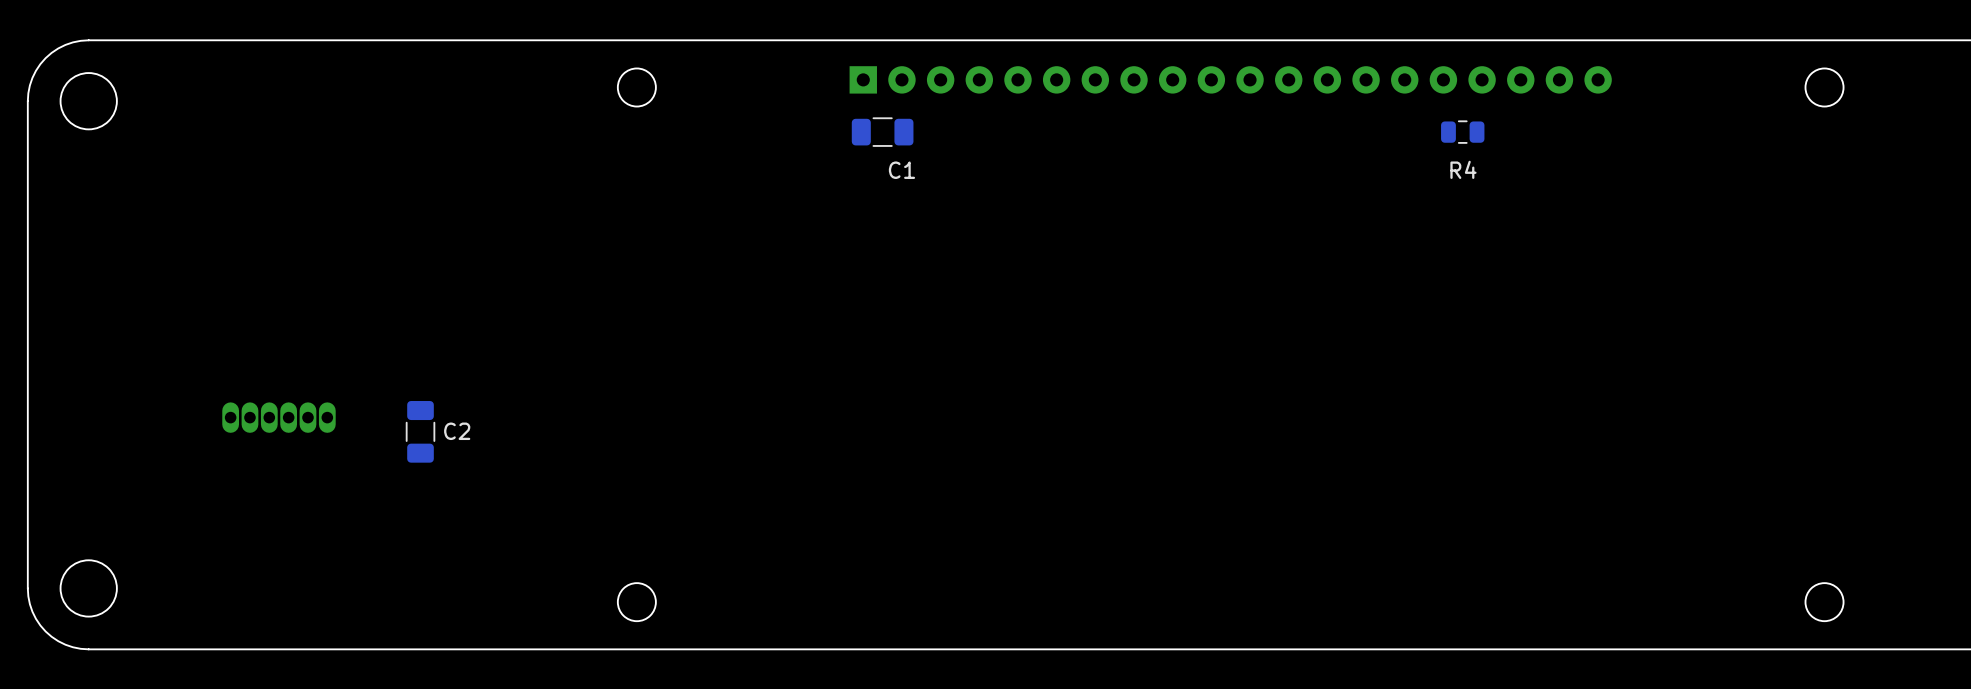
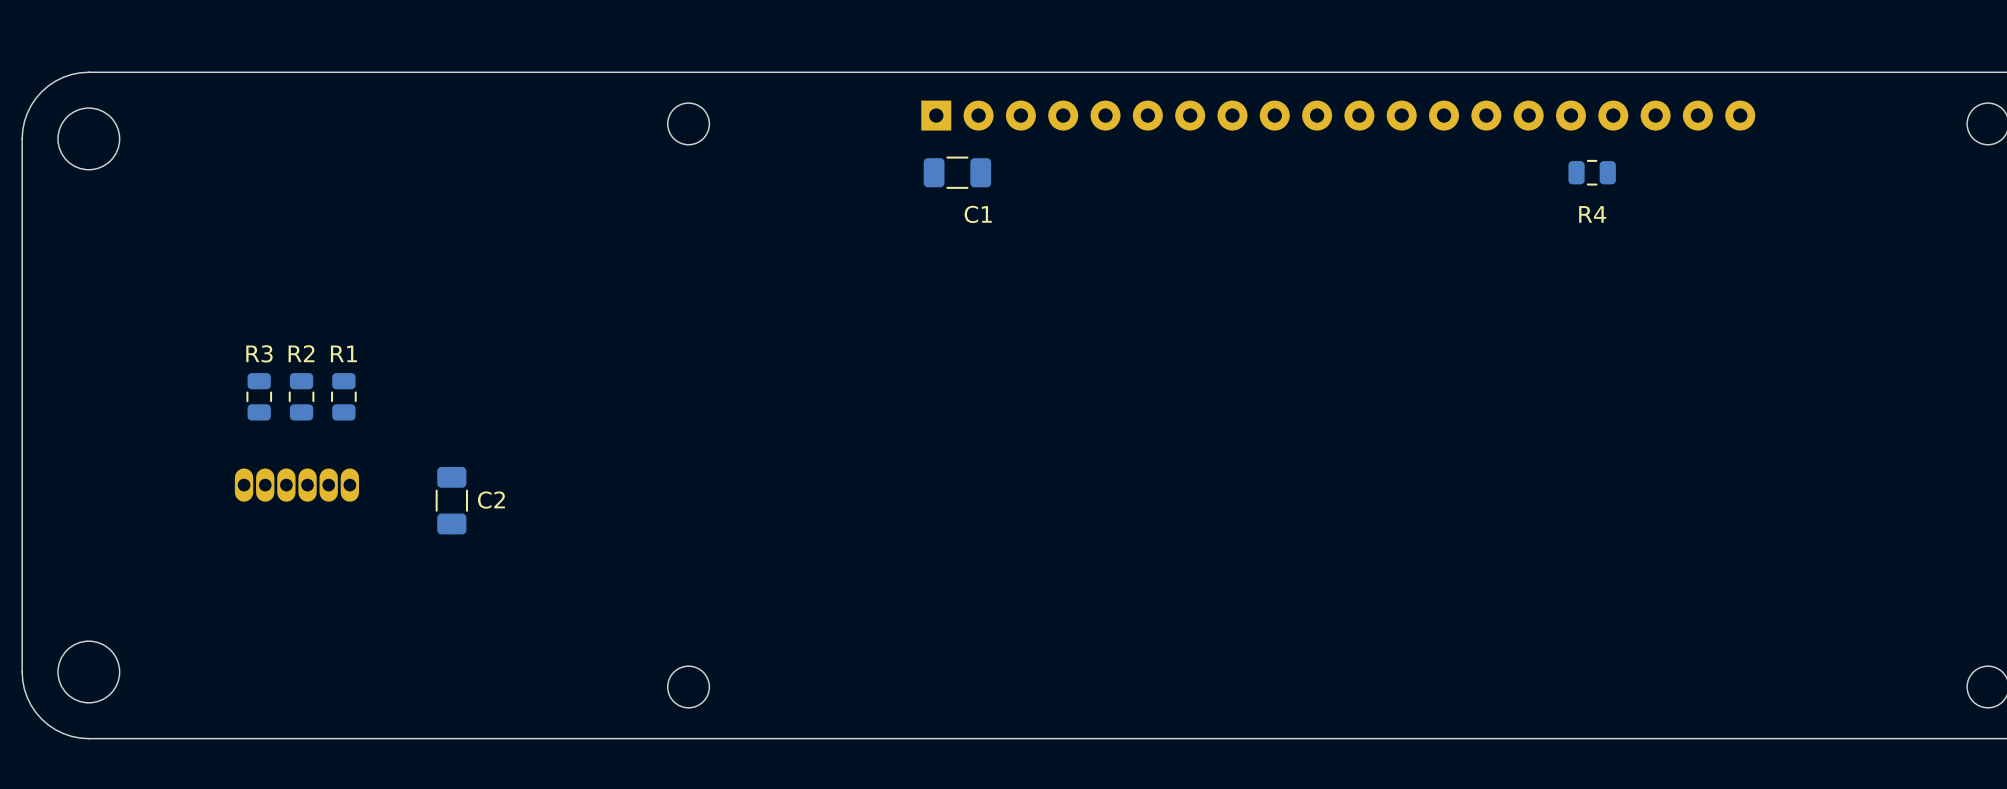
R3: none -> (259, 396)
R2: none -> (301, 396)
R1: none -> (343, 396)

